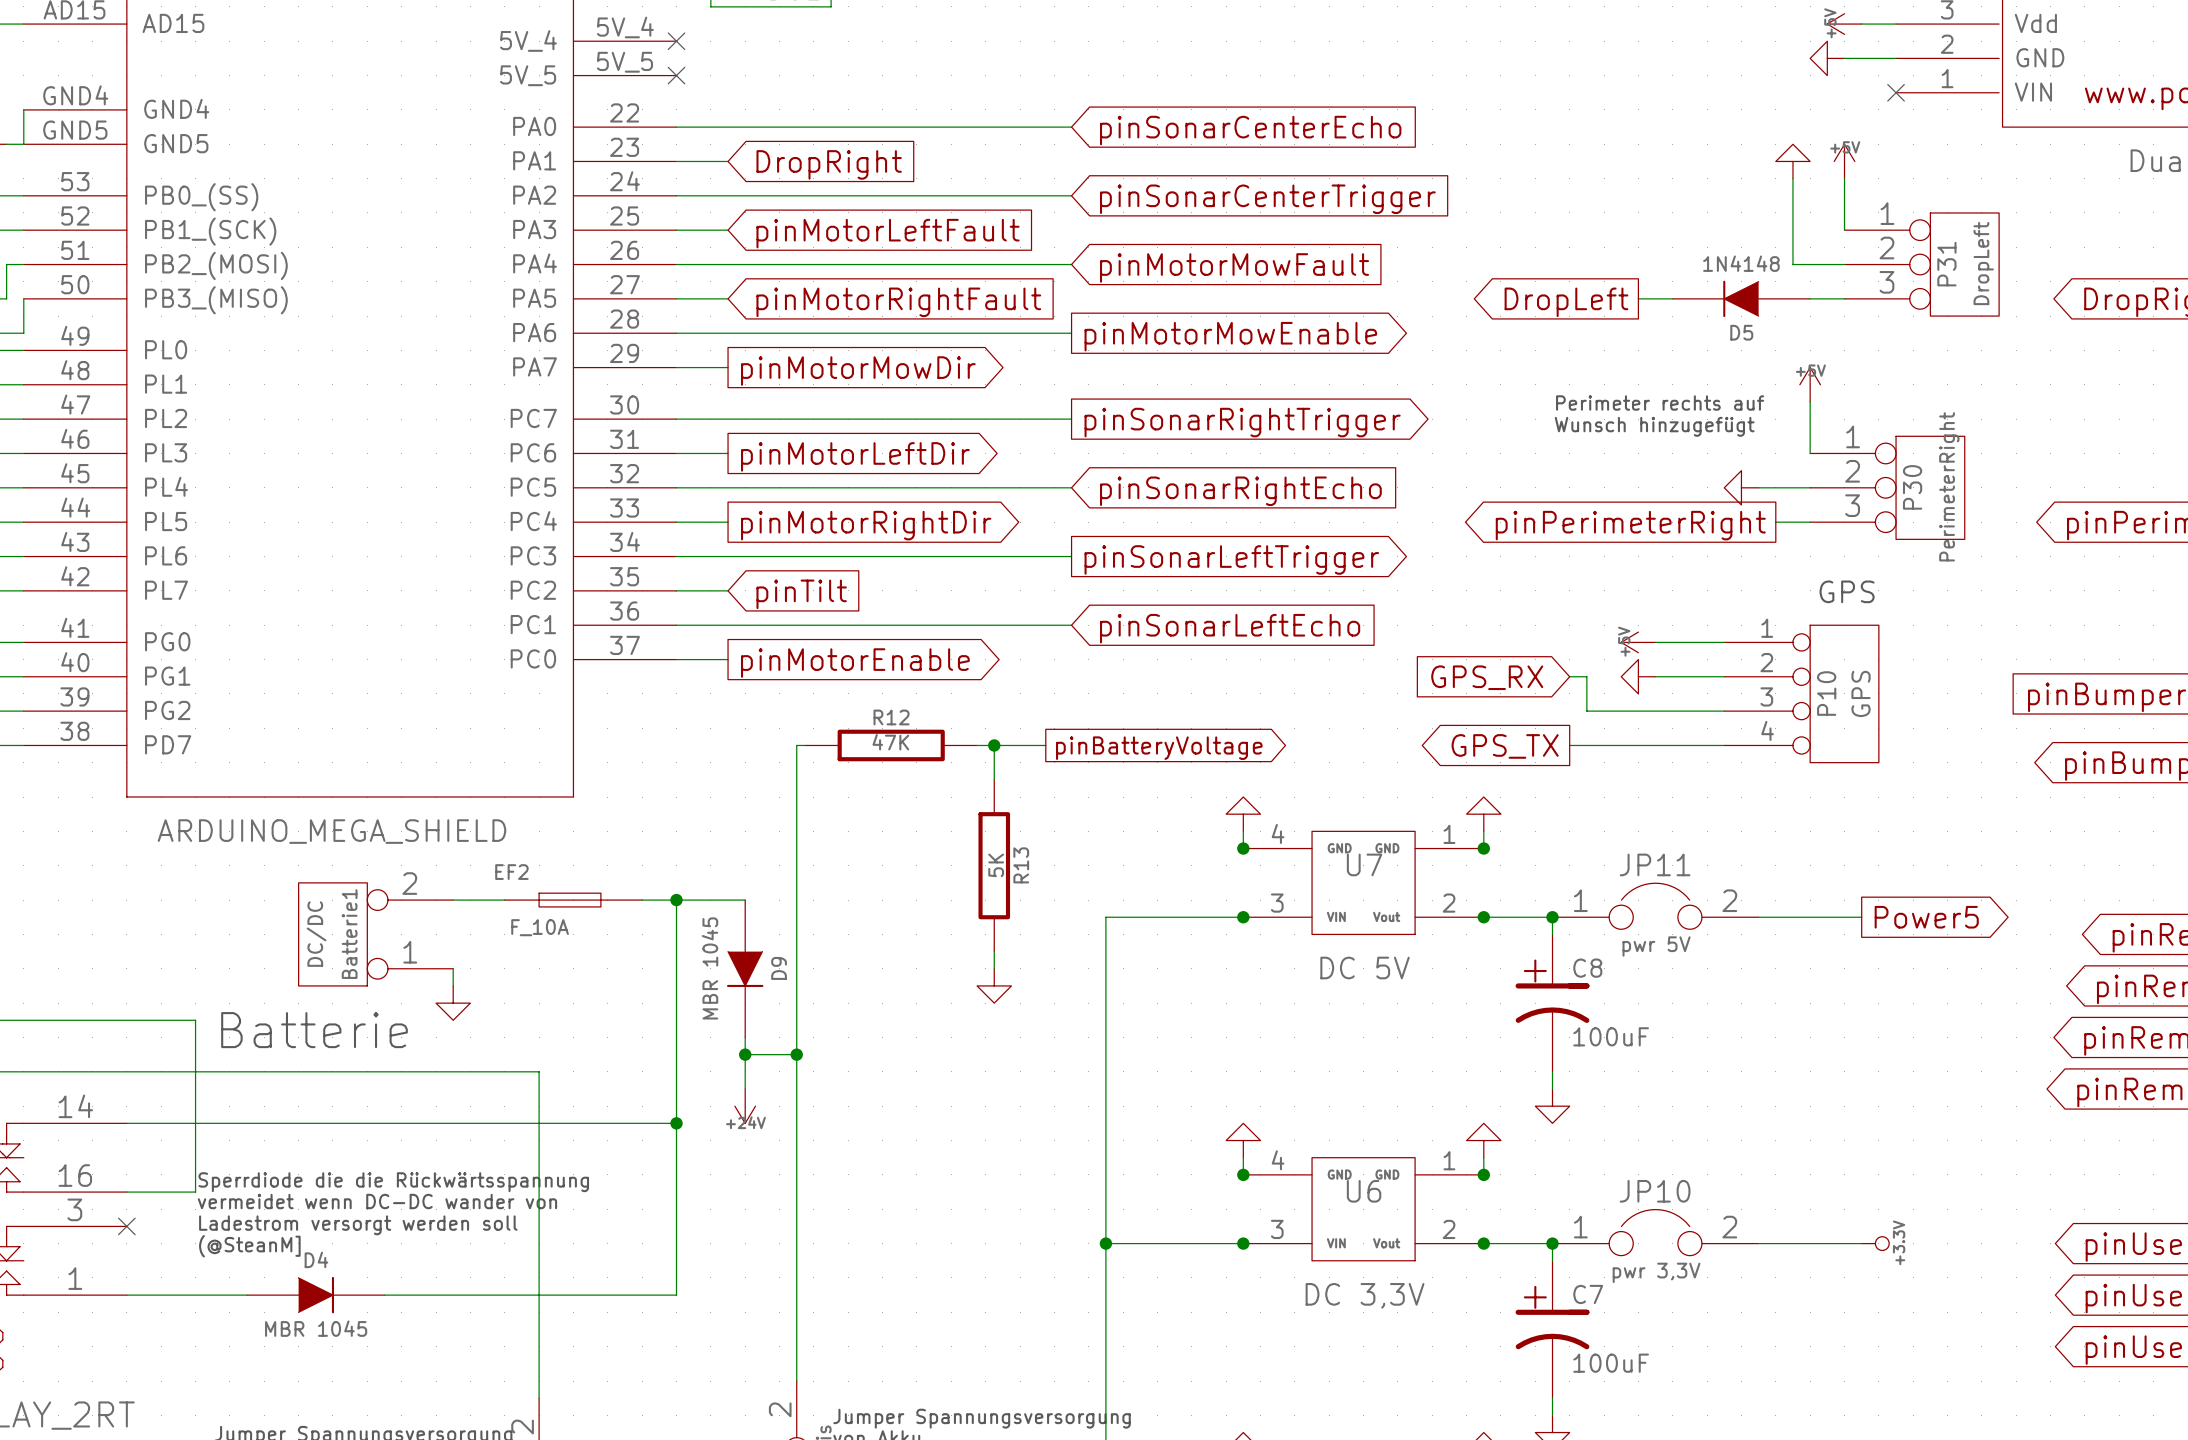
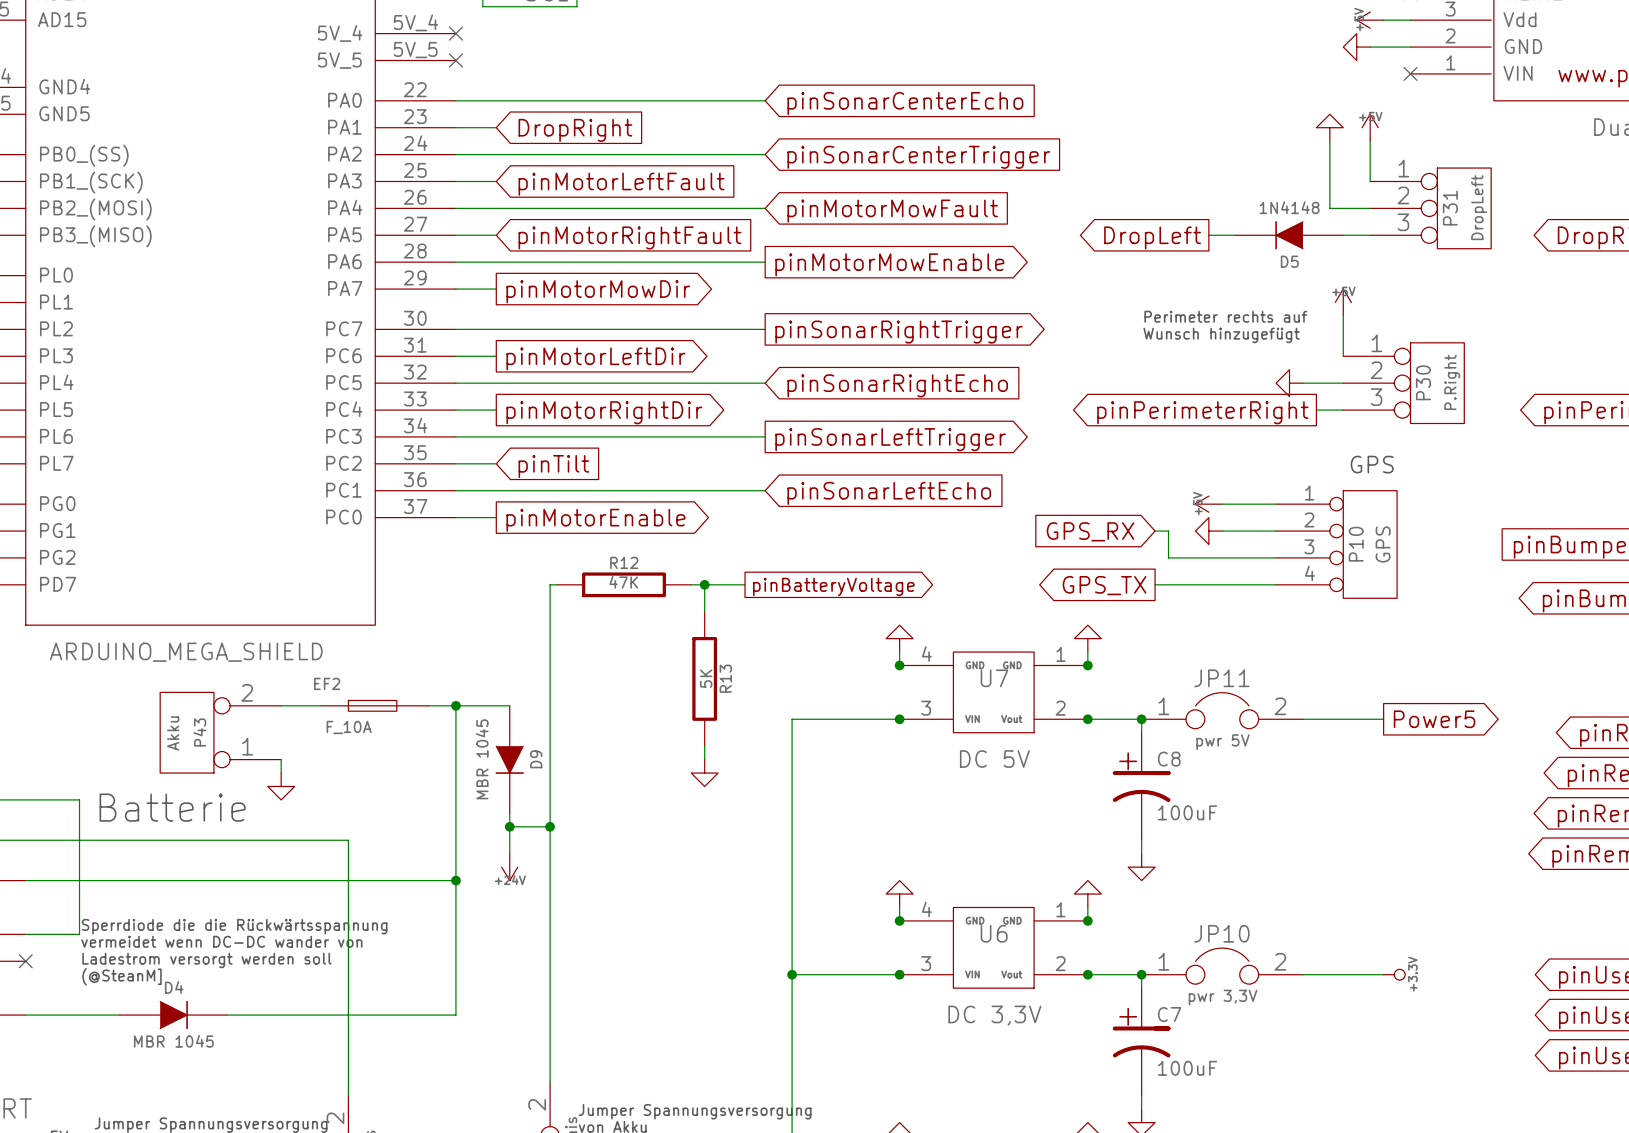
P30 value: PerimeterRight (1949, 486) -> P.Right (1452, 382)
Batterie1 value: DC/DC (316, 934) -> Akku (173, 733)
Batterie1 name: Batterie1 (349, 934) -> P43 (199, 732)

